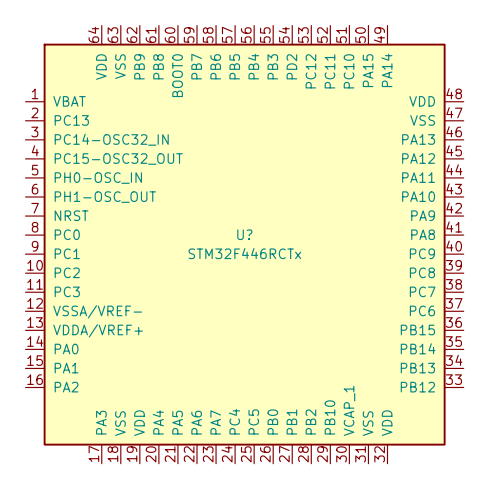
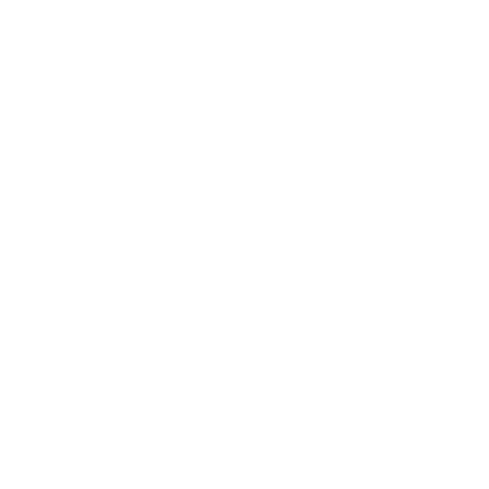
U?: STM32F446RCTx (244, 244) -> none

